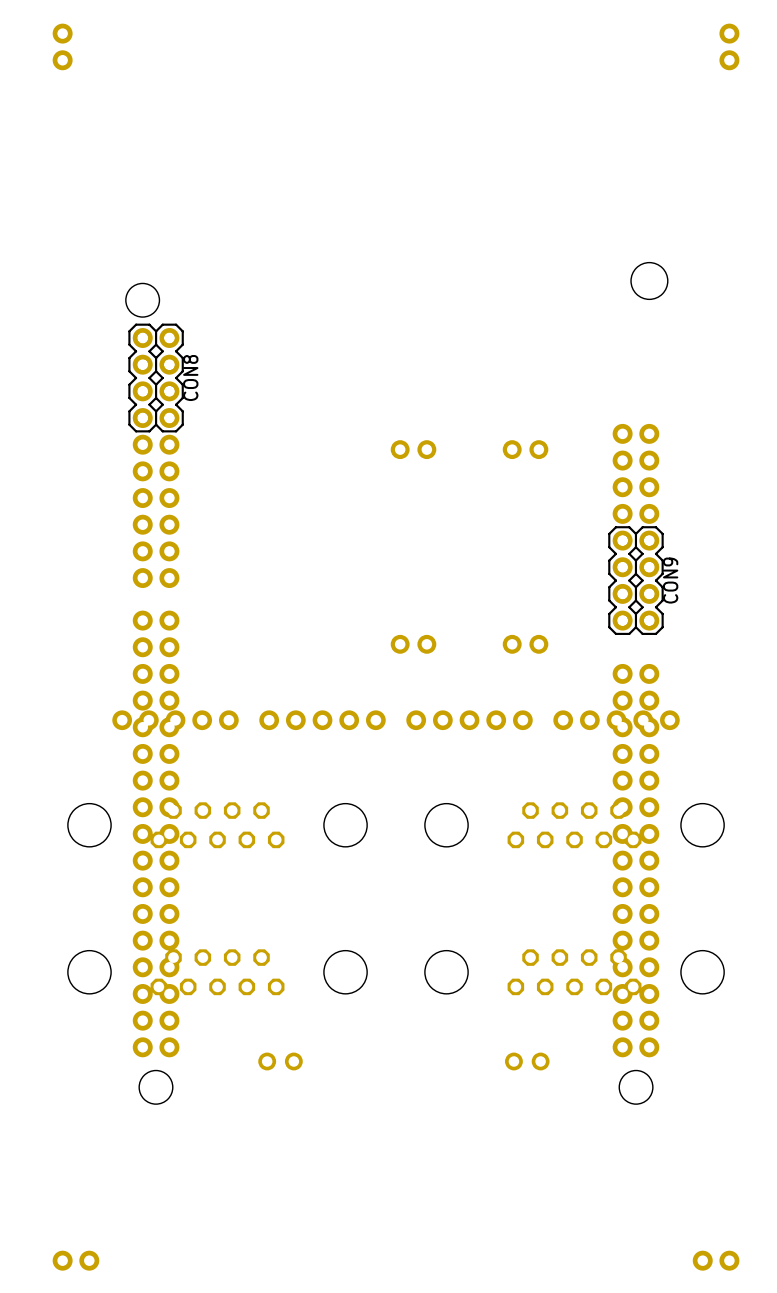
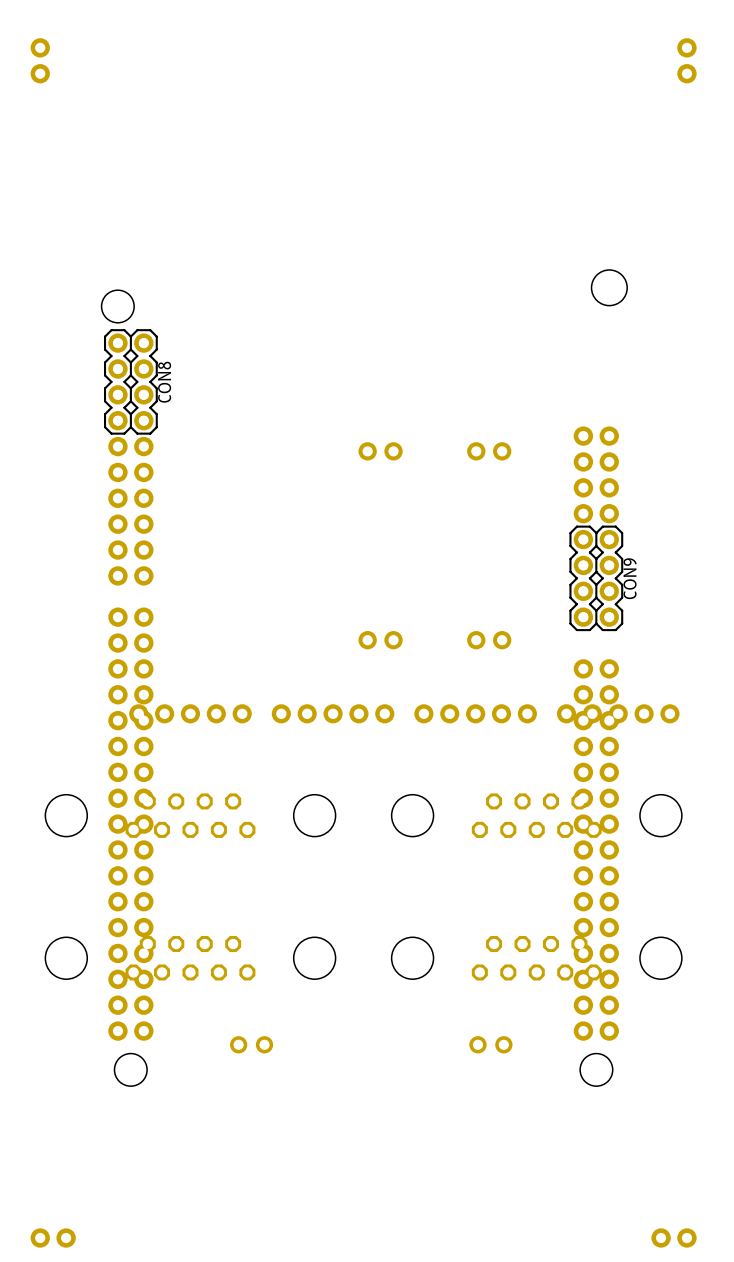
part position: (175, 720) -> (190, 713)
part position: (322, 720) -> (333, 713)
part position: (469, 720) -> (475, 713)
part position: (616, 720) -> (618, 713)

